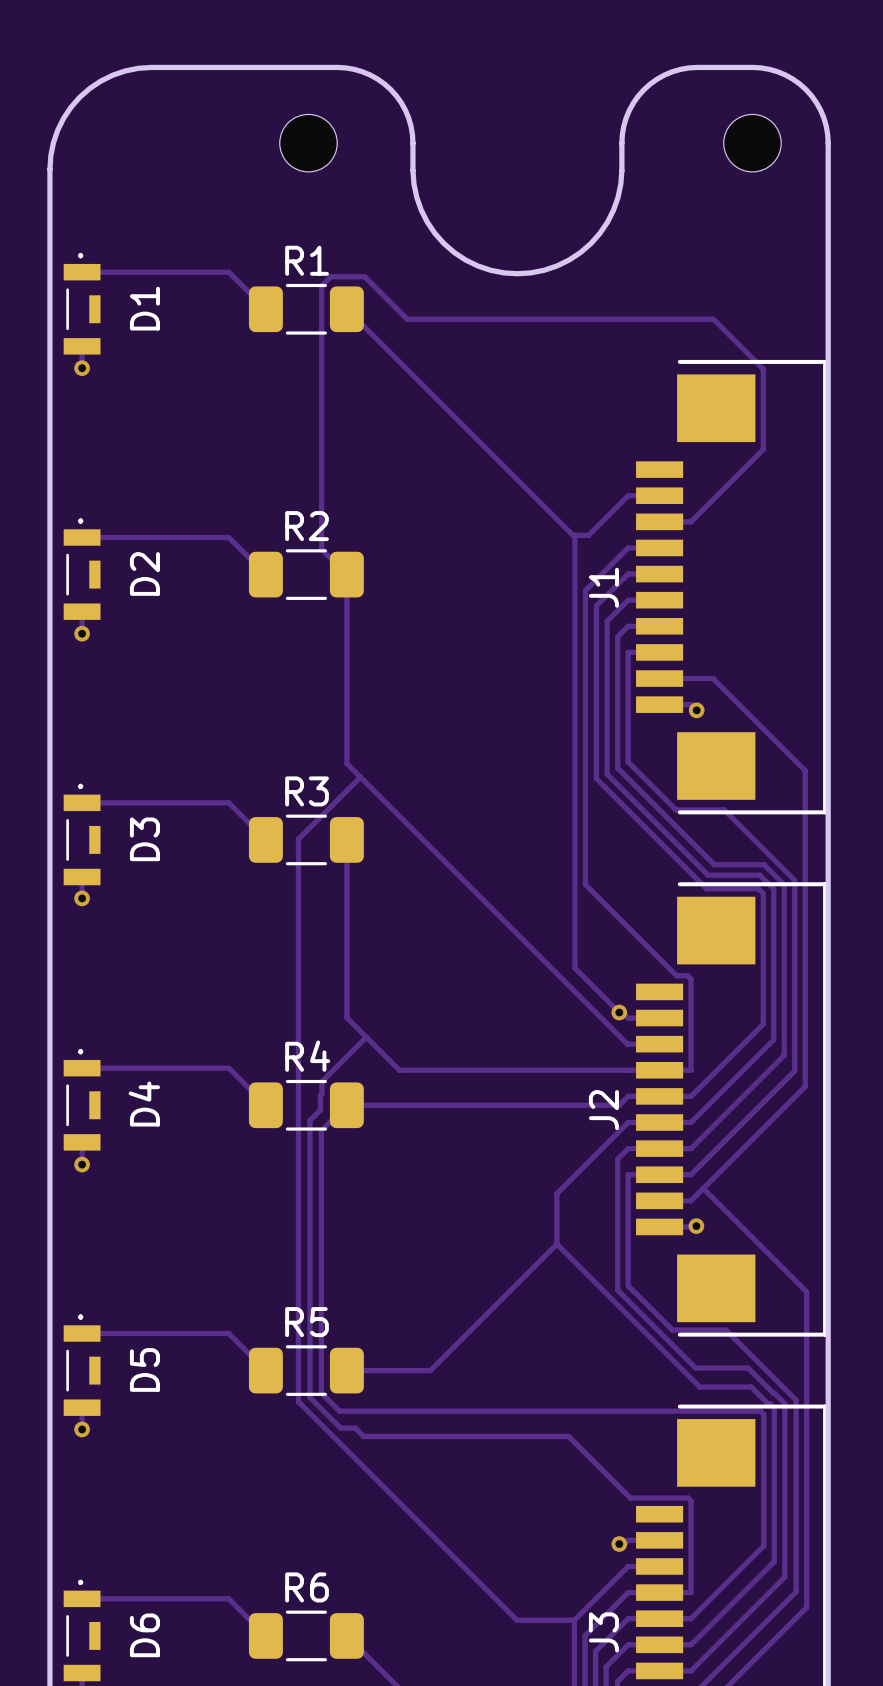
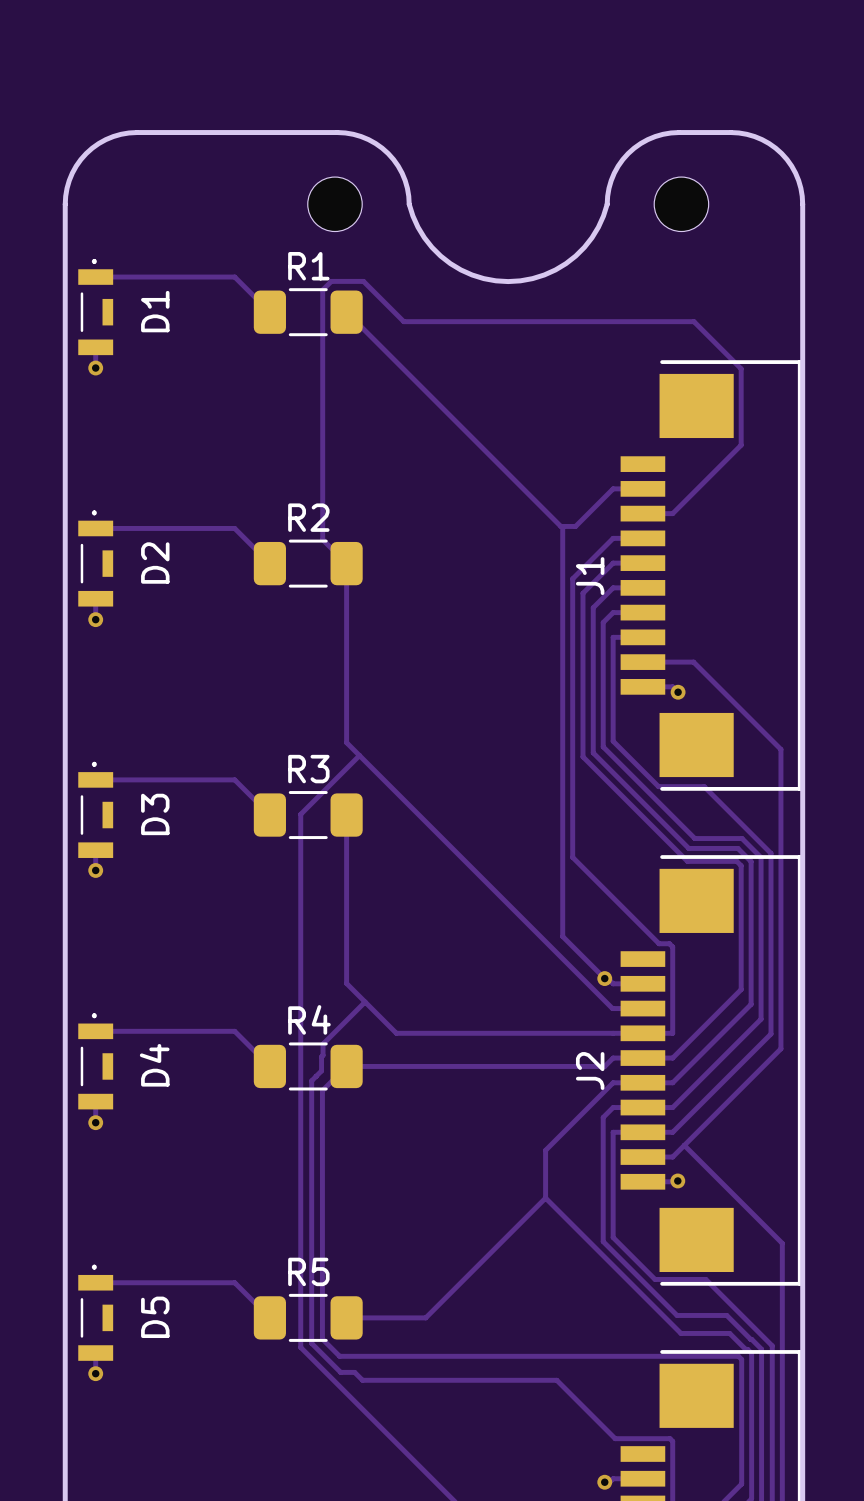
part position: (308, 143) -> (334, 204)
part position: (752, 143) -> (681, 204)
board edge: (49, 195) (50, 155) (53, 142) (63, 118) (70, 107) (79, 97) (100, 81) (125, 70) (151, 67) (337, 67) (362, 71) (377, 79) (396, 95) (408, 118) (412, 134) (414, 184) (421, 210) (427, 222) (444, 243) (465, 259) (477, 265) (503, 272) (530, 272) (557, 265) (580, 252) (599, 233) (607, 222) (618, 197) (621, 170) (622, 134) (629, 110) (638, 95) (650, 83) (664, 74) (680, 69) (697, 67) (760, 67) (785, 74) (799, 83) (816, 102) (826, 126) (828, 195) -> (65, 204) (69, 180) (80, 159) (98, 143) (121, 134) (137, 132) (337, 132) (353, 134) (375, 143) (393, 159) (405, 180) (409, 204) (417, 227) (440, 256) (472, 274) (508, 281) (544, 274) (575, 256) (598, 227) (607, 204) (611, 180) (622, 159) (640, 143) (662, 134) (730, 132) (746, 134) (762, 139) (775, 148) (791, 166) (798, 180) (802, 204)

